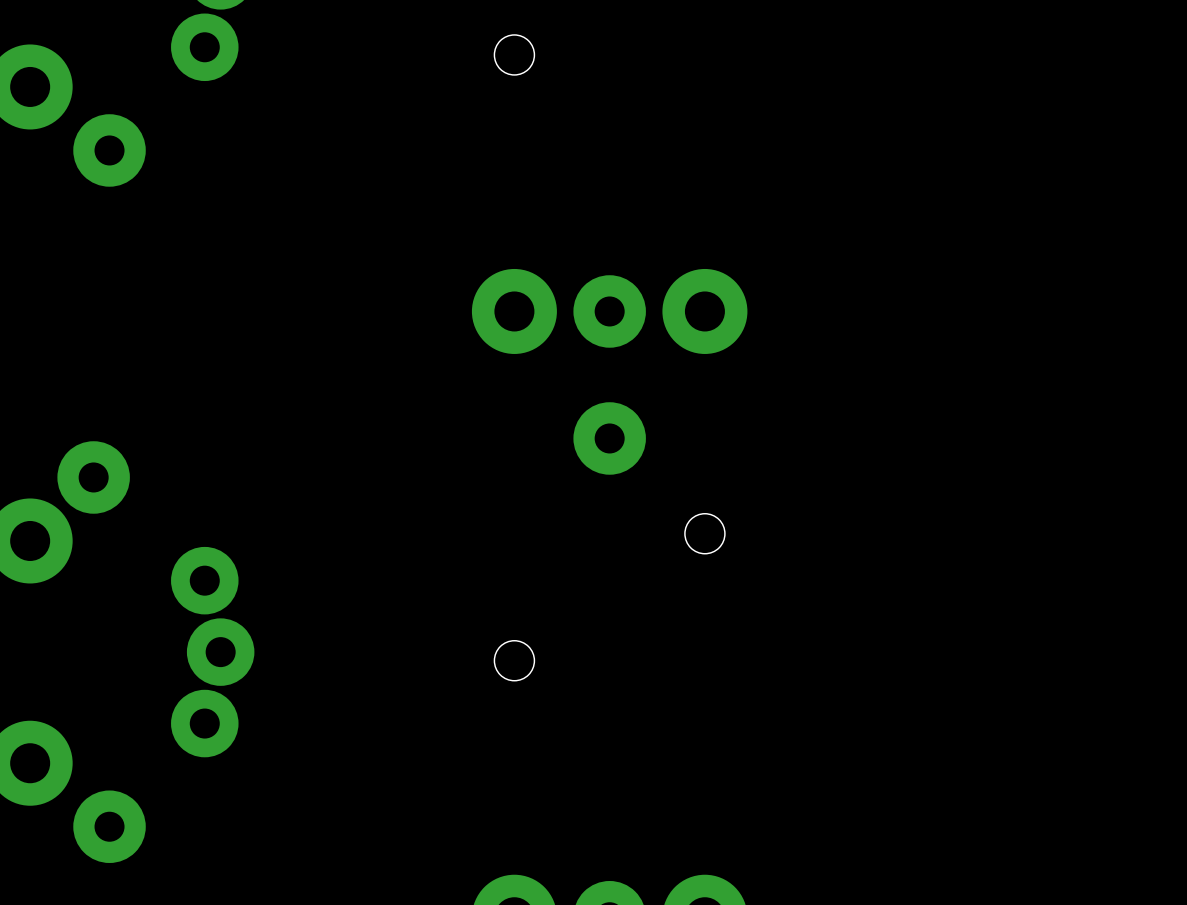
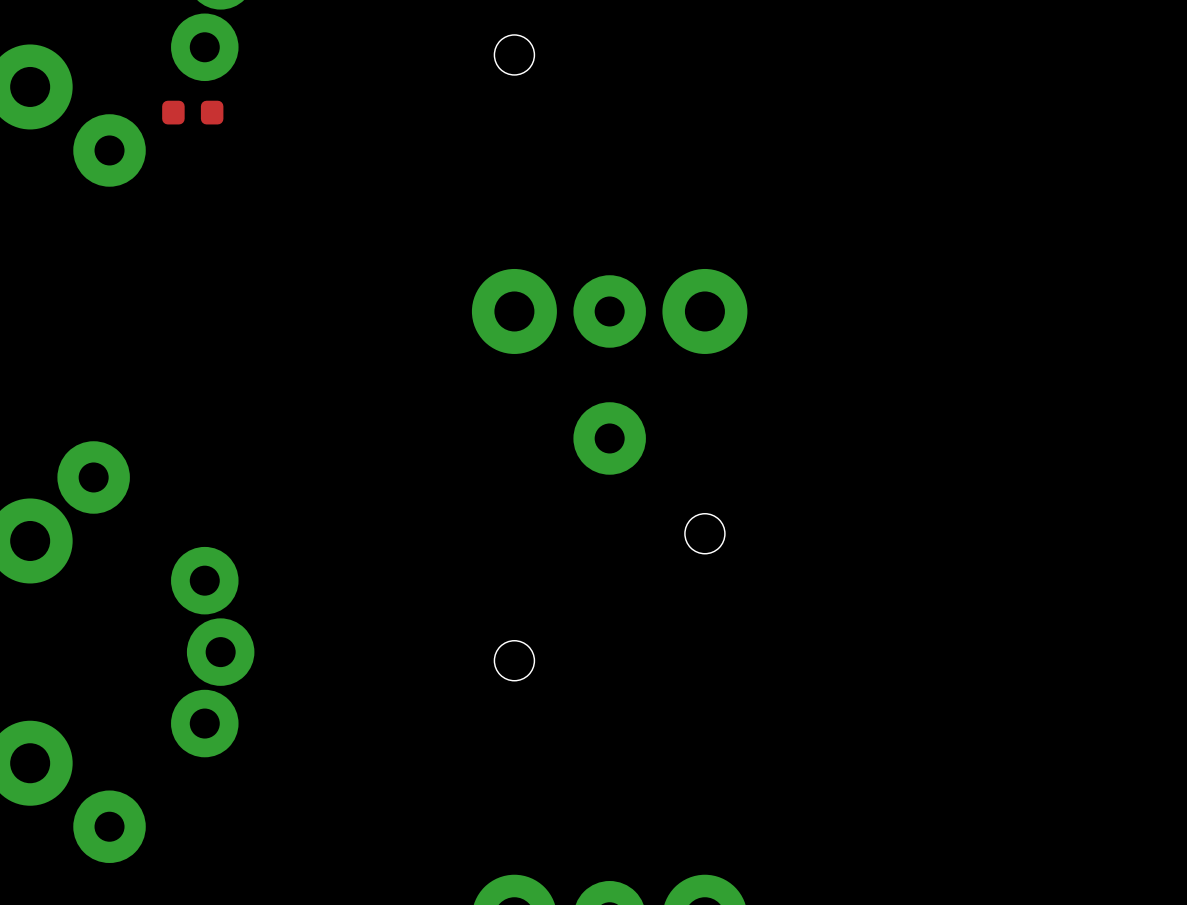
part: none -> (192, 112)

